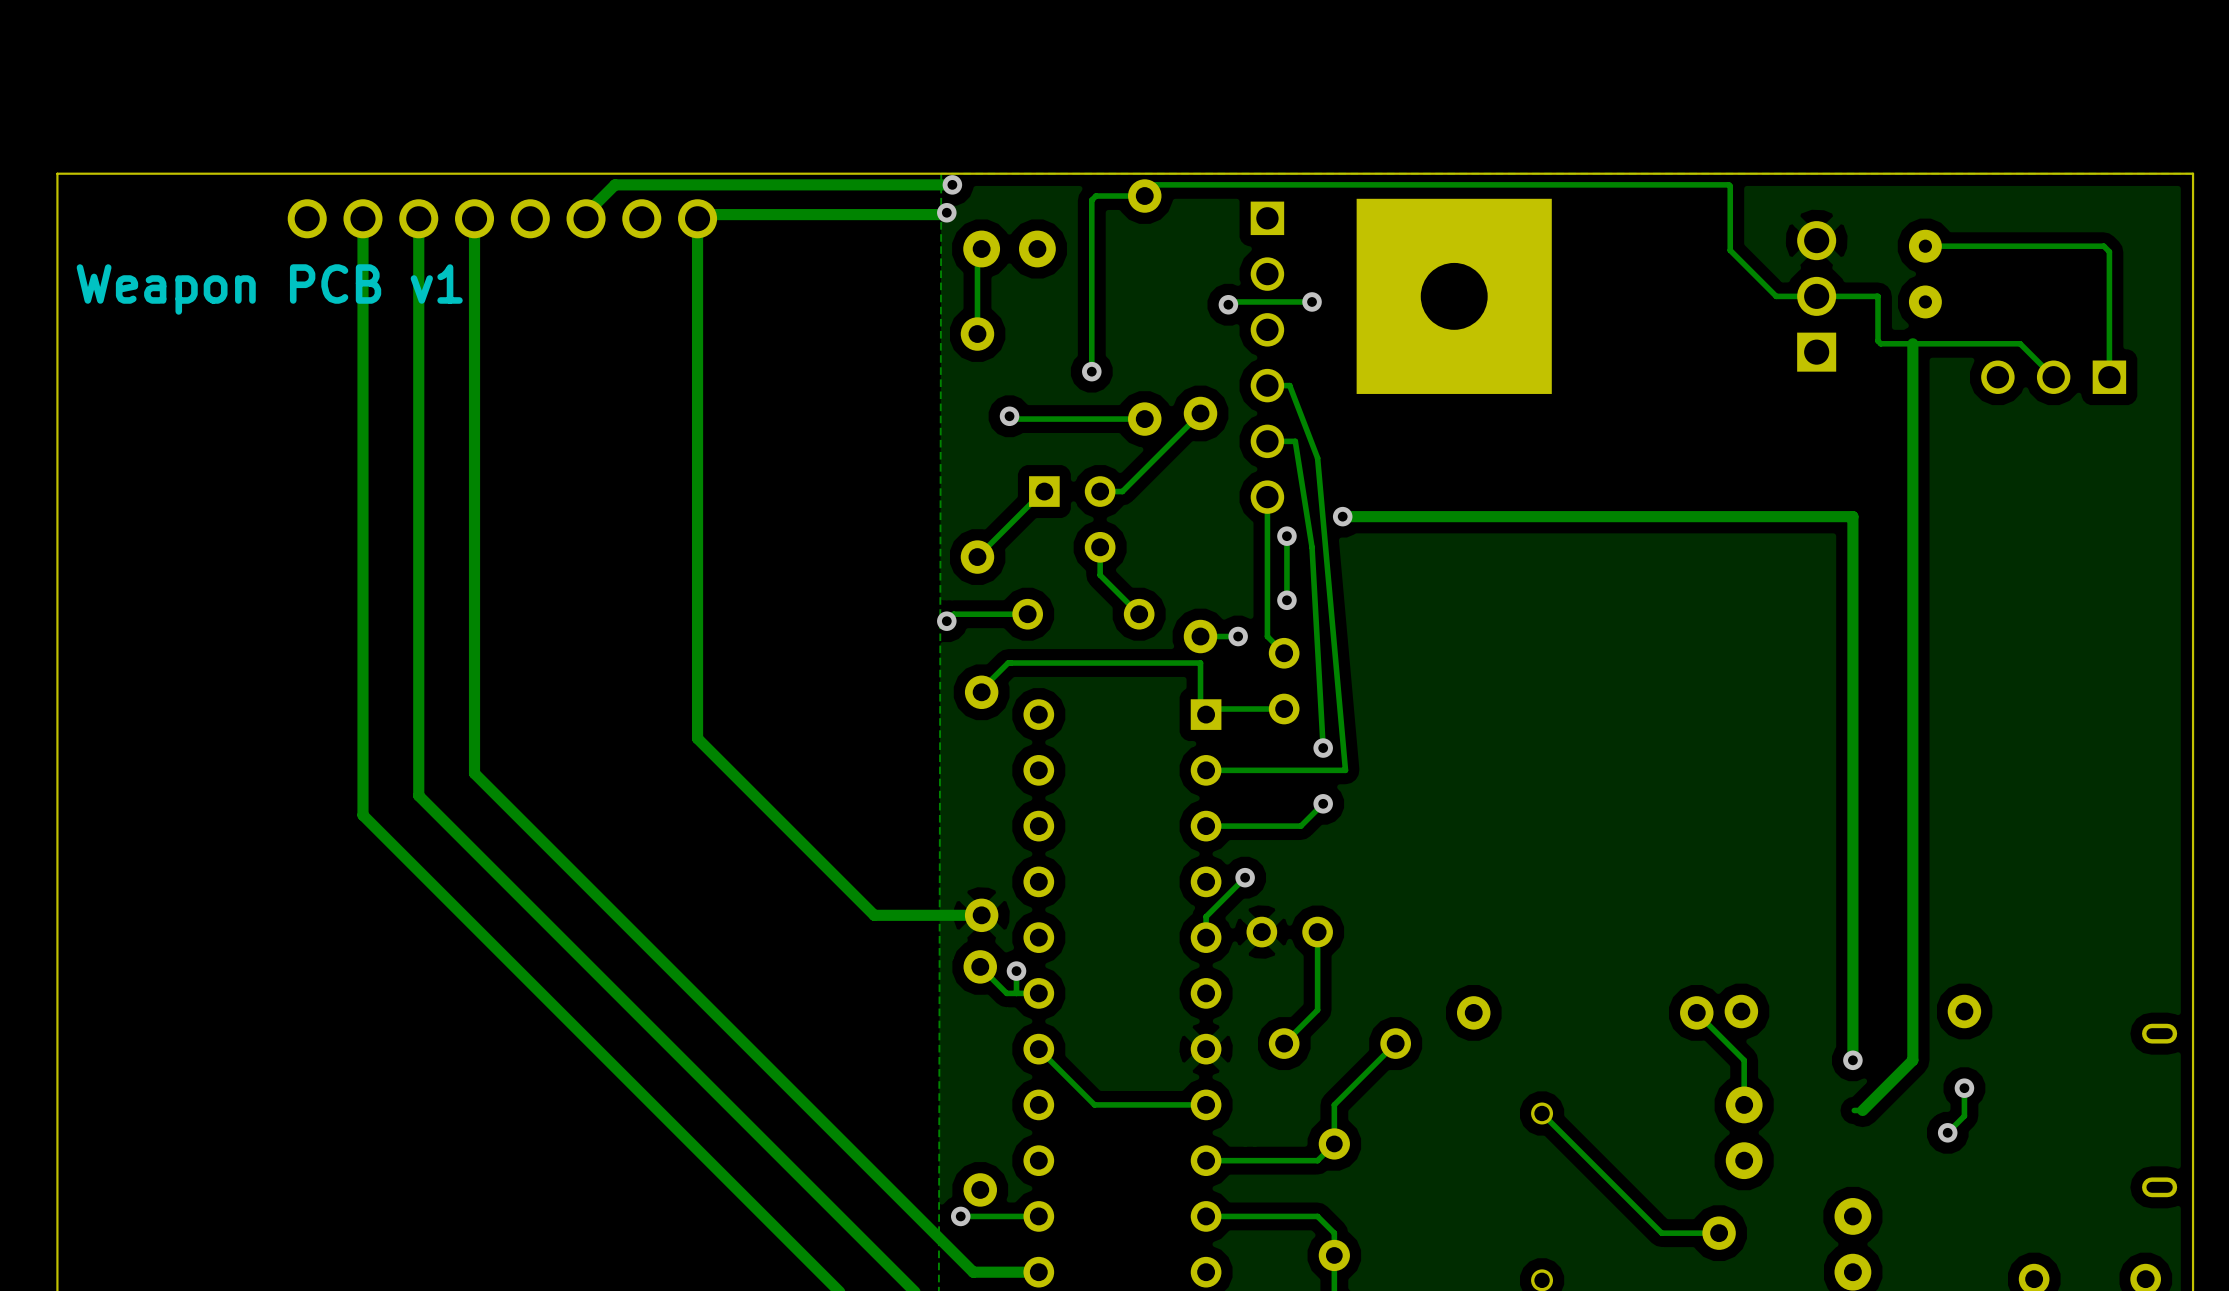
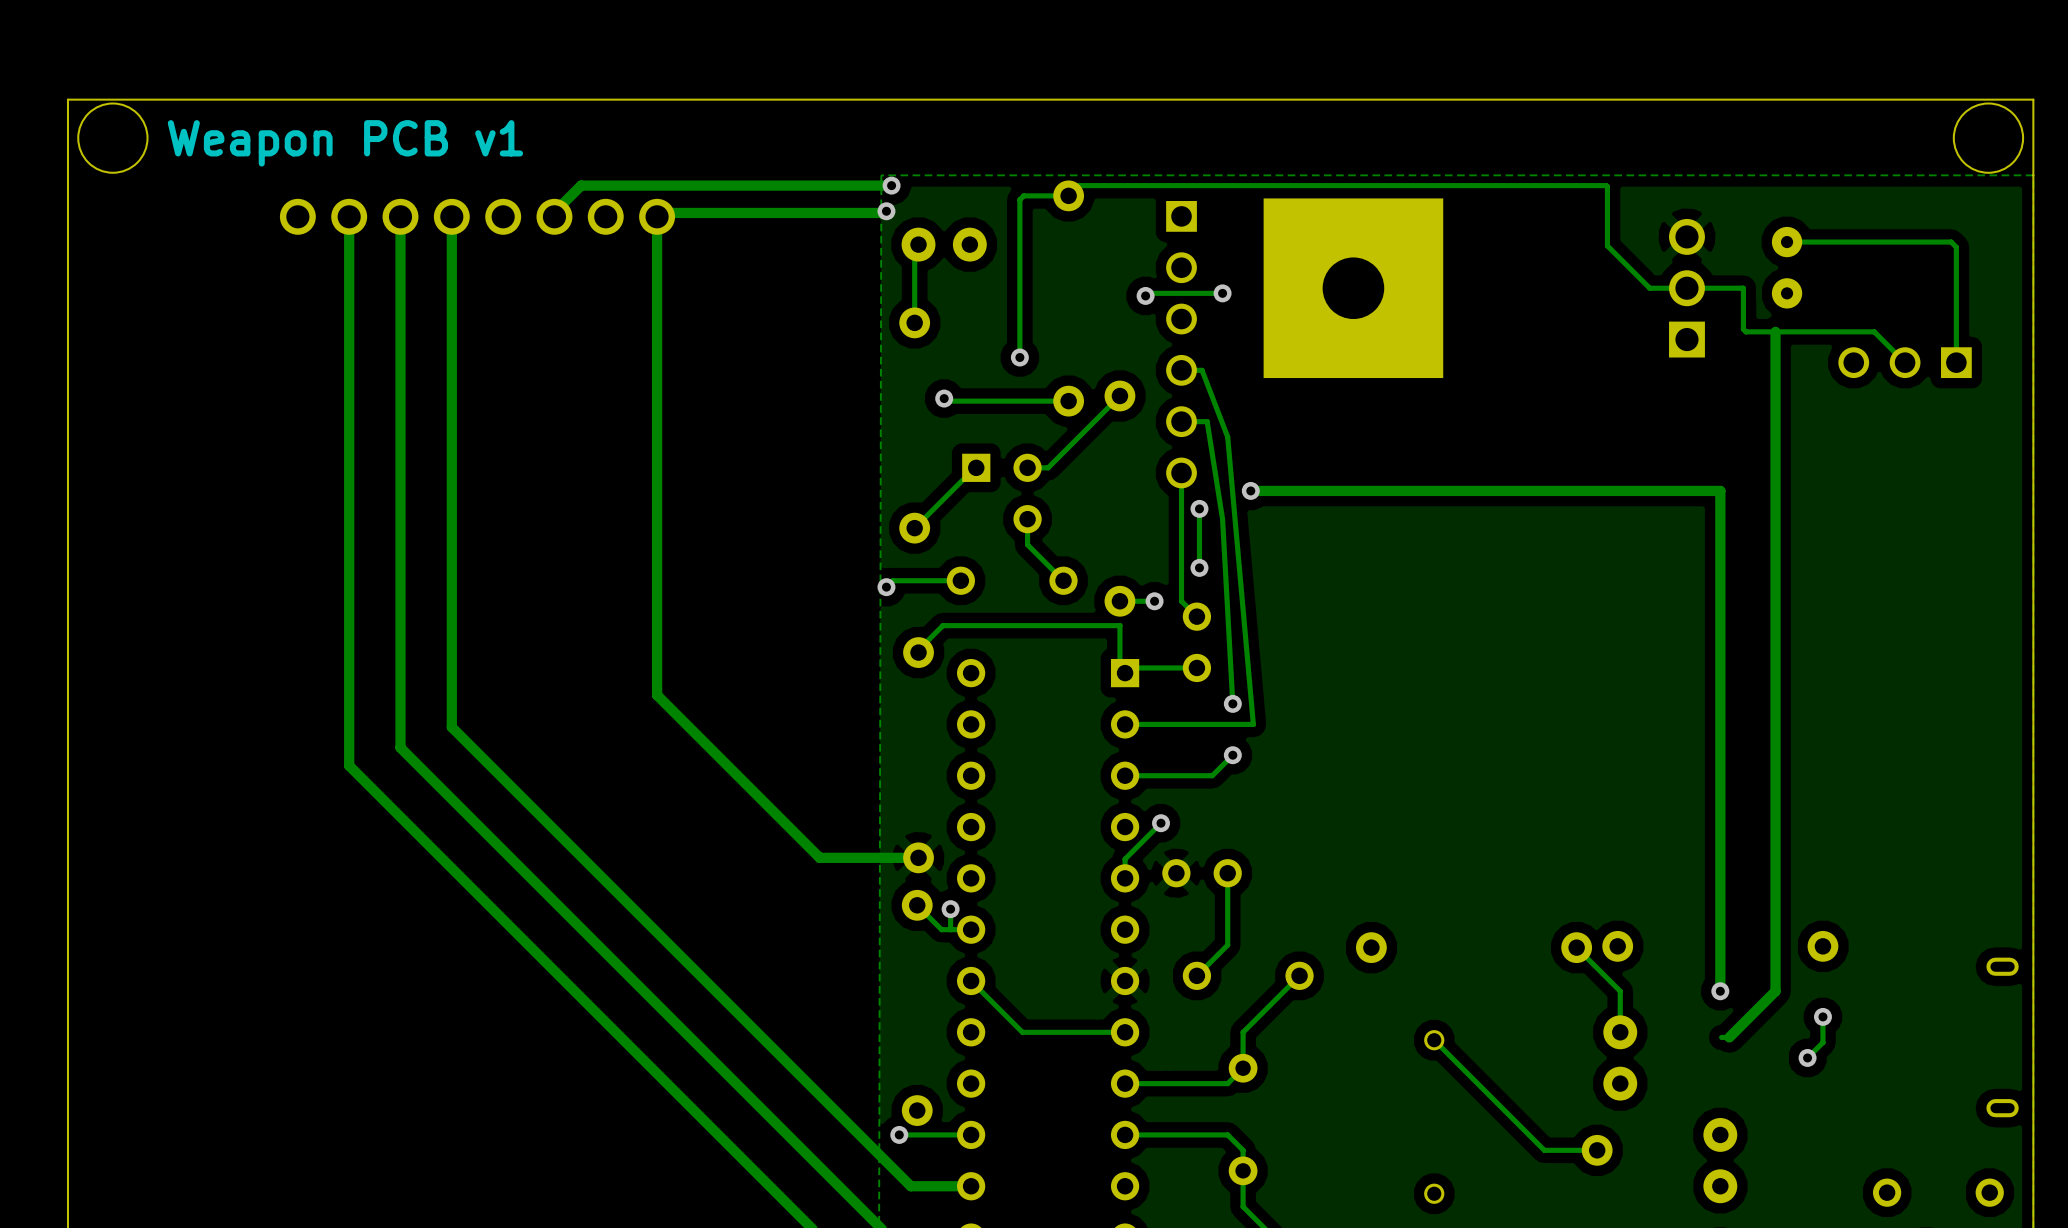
round board edge: none -> [77, 102, 149, 174]
round board edge: none -> [1952, 102, 2025, 174]
board edge: (2193, 173) (57, 173) -> (2033, 175) (2033, 99) (67, 99) (67, 175)
text position: Weapon PCB v1 (269, 289) -> Weapon PCB v1 (345, 143)

